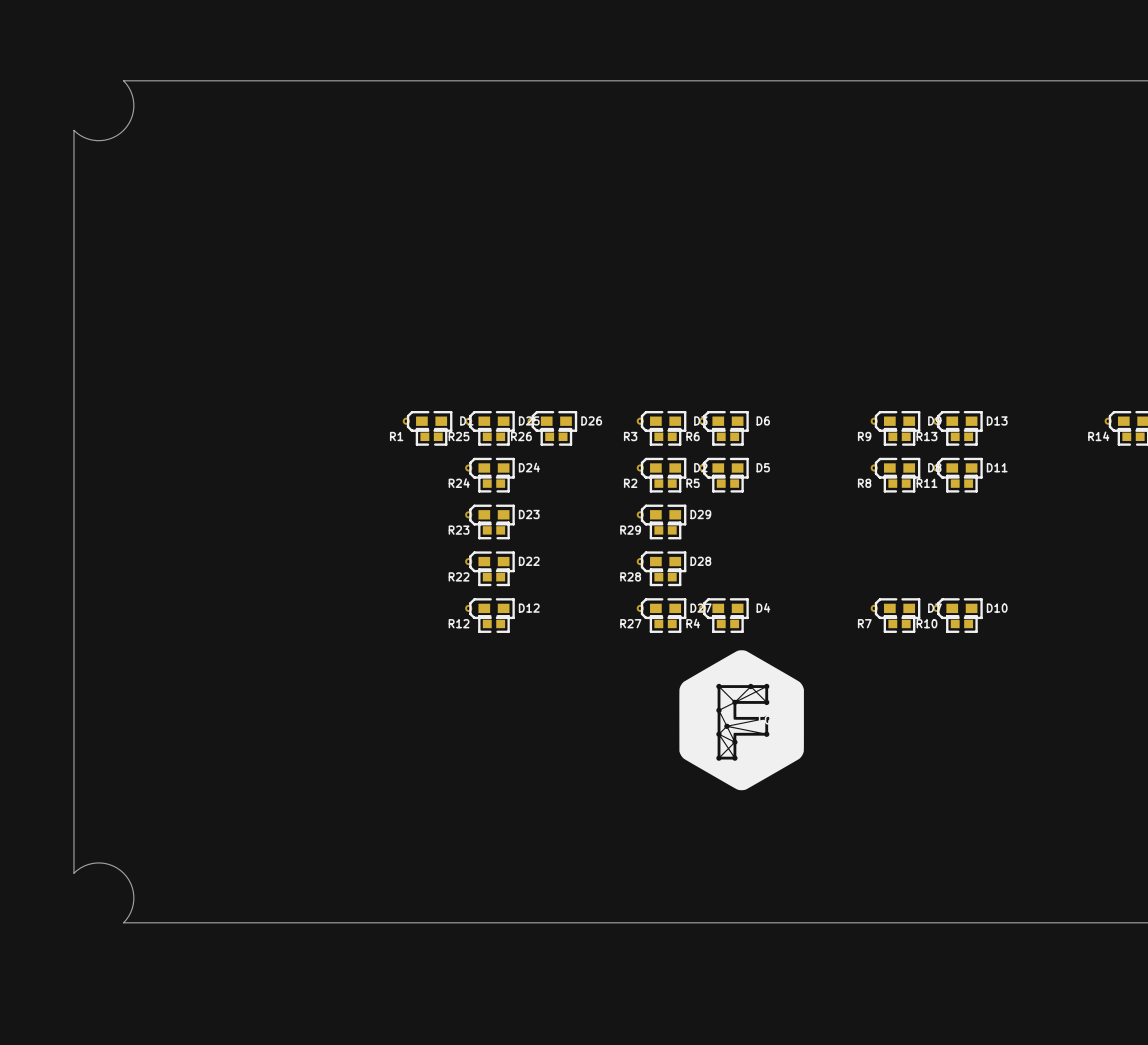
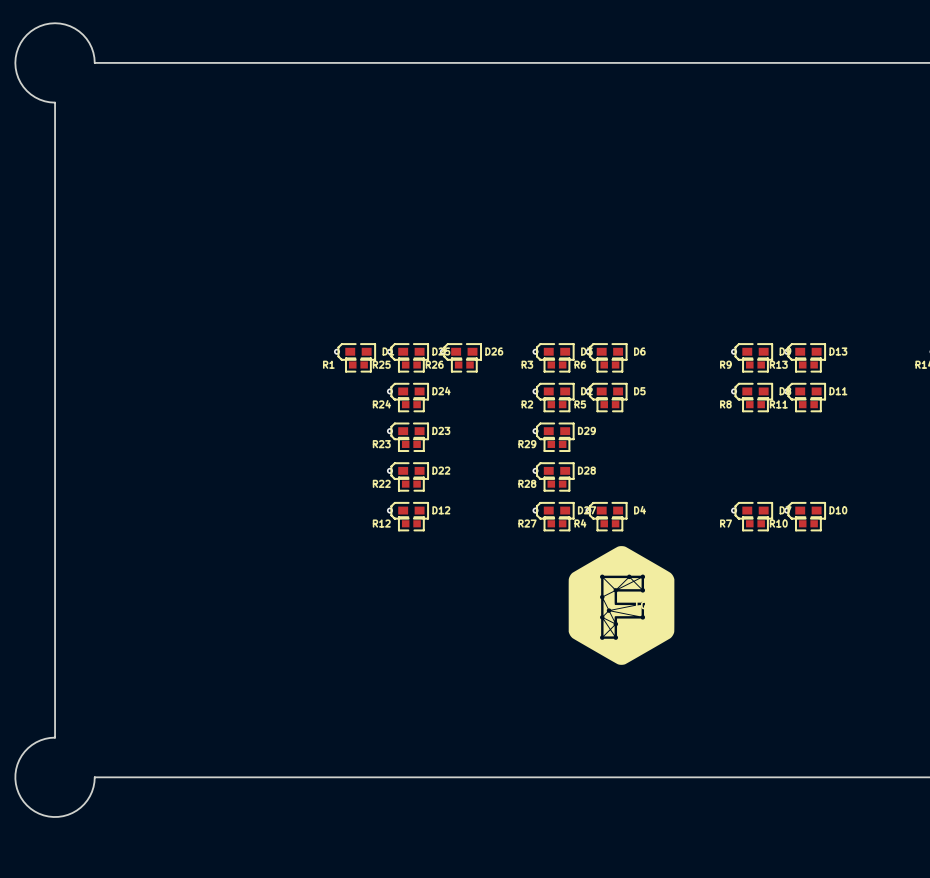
board edge: (123, 80) (130, 91) (133, 103) (132, 116) (123, 130) (109, 139) (96, 140) (84, 137) (73, 130) -> (97, 62) (94, 62) (93, 52) (86, 38) (70, 26) (60, 23) (44, 24) (26, 34) (16, 52) (15, 62) (18, 78) (30, 94) (44, 101) (55, 102) (55, 105)
board edge: (73, 873) (84, 866) (96, 862) (113, 866) (123, 873) (130, 883) (133, 895) (132, 908) (123, 922) -> (55, 735) (55, 737) (40, 740) (31, 745) (21, 755) (17, 764) (15, 783) (20, 797) (26, 805) (43, 815) (53, 817) (67, 814) (80, 807) (87, 800) (93, 787) (94, 777) (97, 777)

